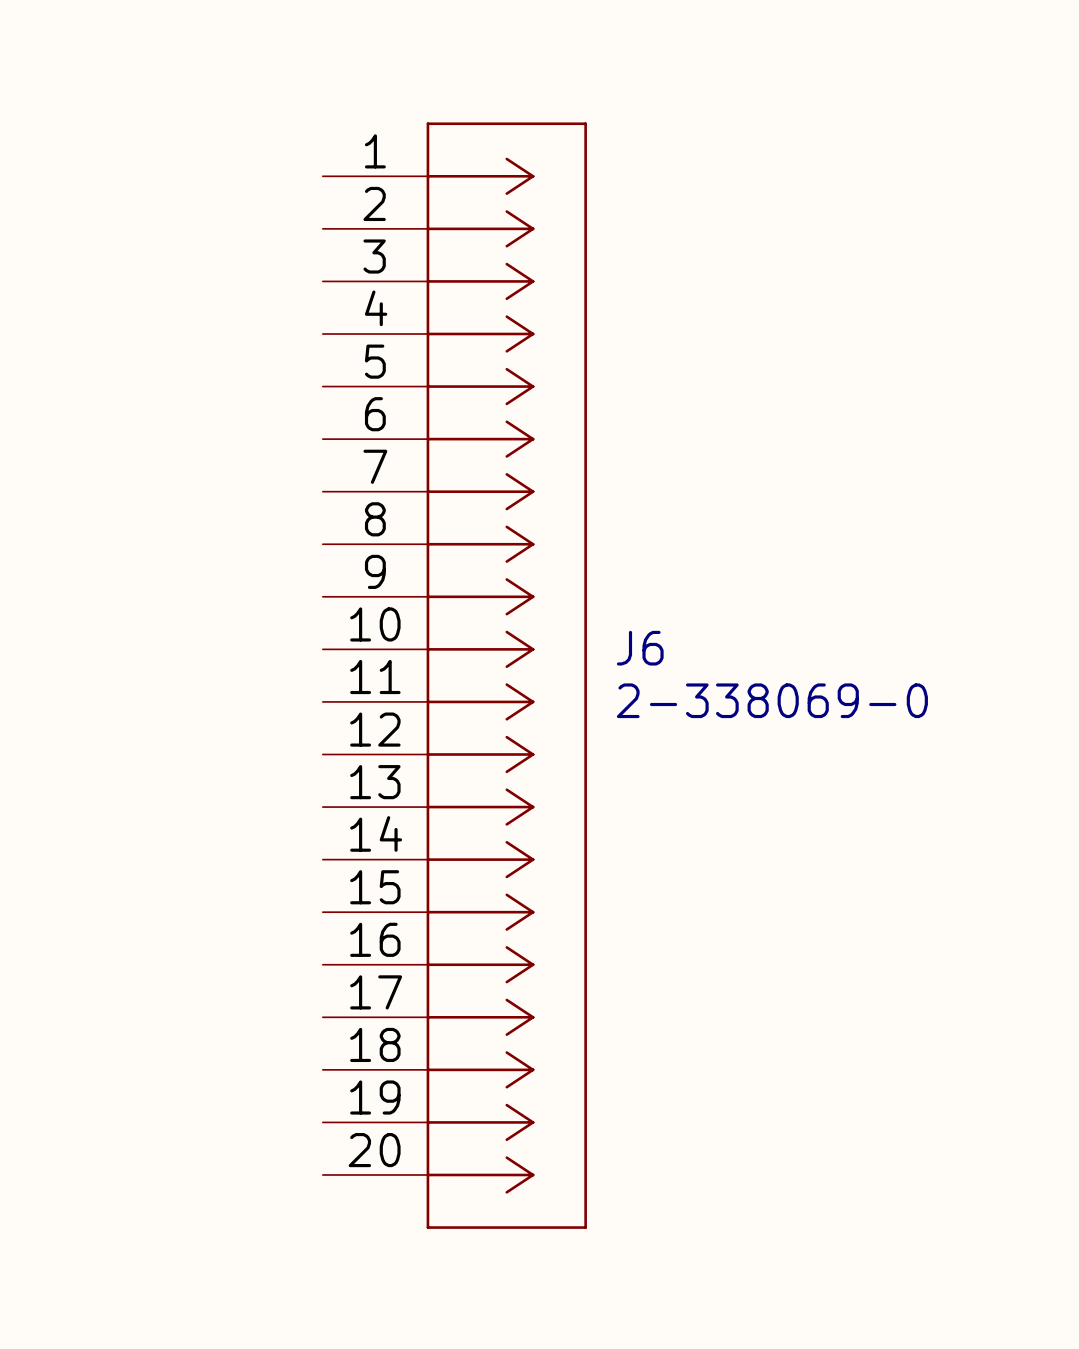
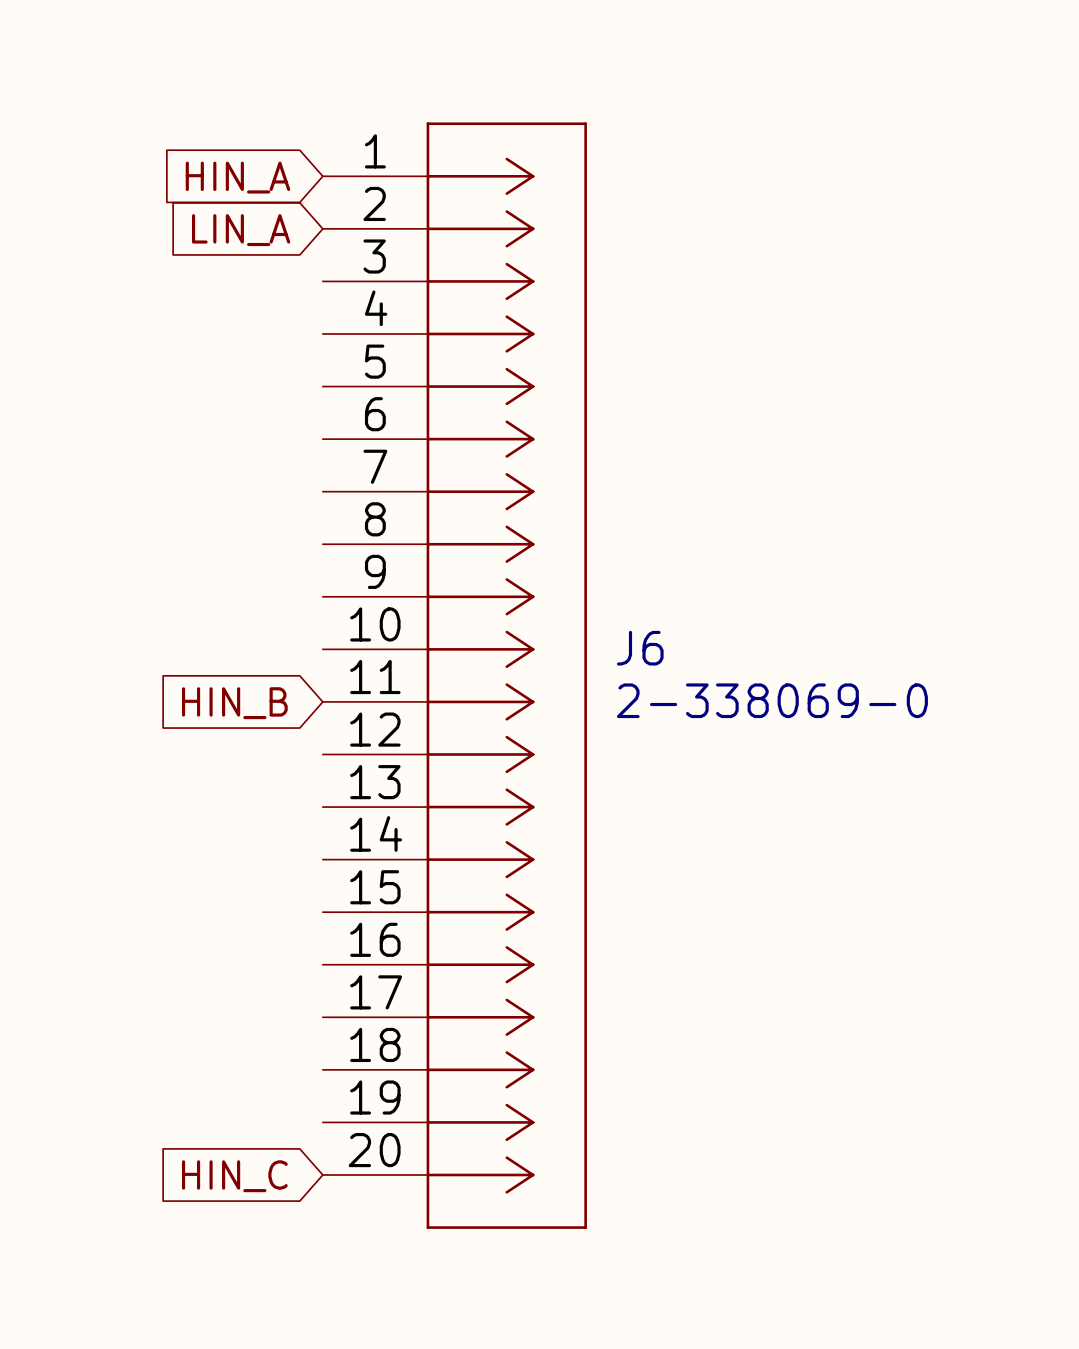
global label: none -> HIN_A (237, 177)
global label: none -> LIN_A (241, 230)
global label: none -> HIN_B (234, 703)
global label: none -> HIN_C (234, 1176)

